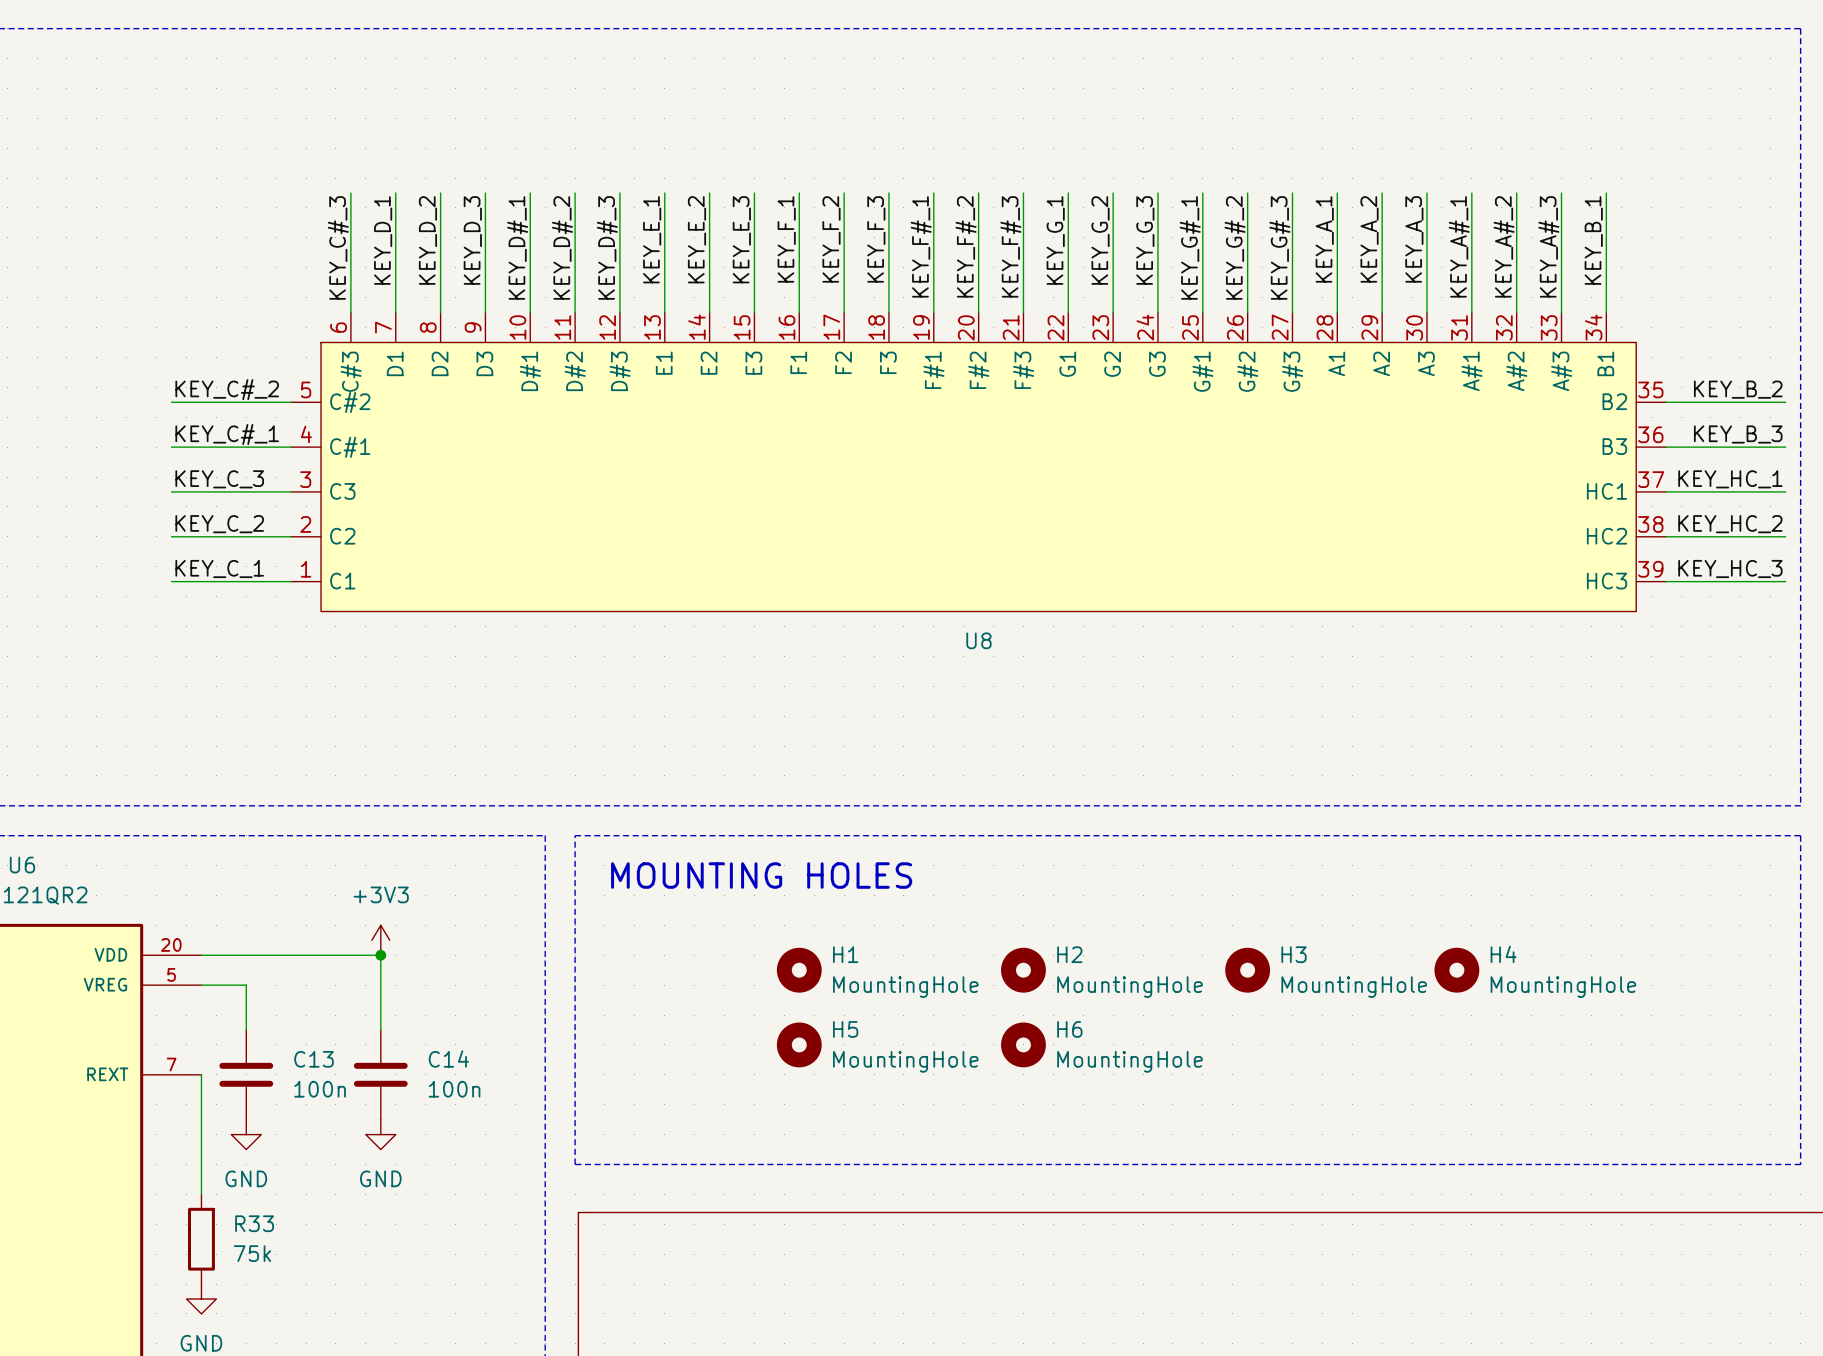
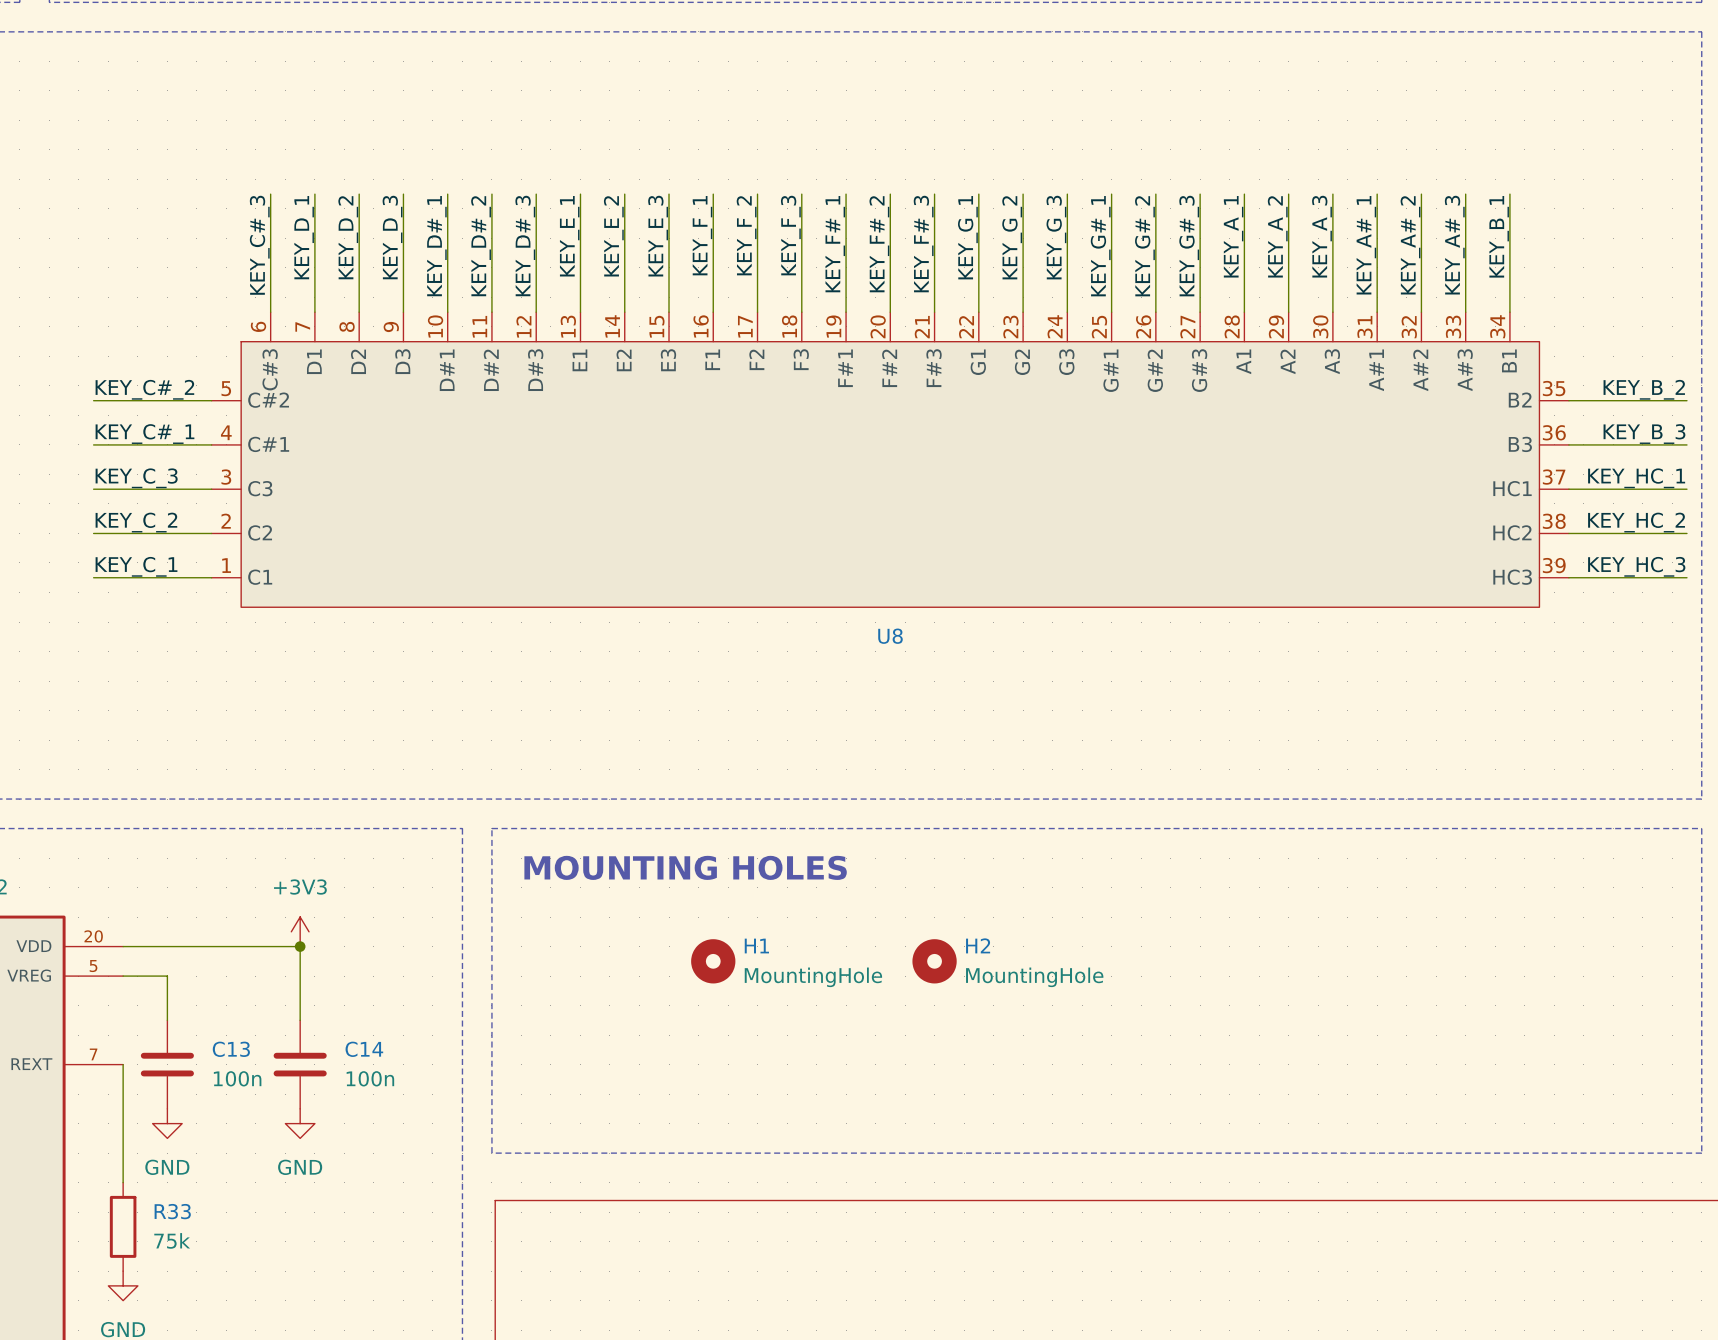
H3: MountingHole (1247, 970) -> none
H4: MountingHole (1456, 970) -> none
H5: MountingHole (799, 1044) -> none
H6: MountingHole (1023, 1044) -> none

